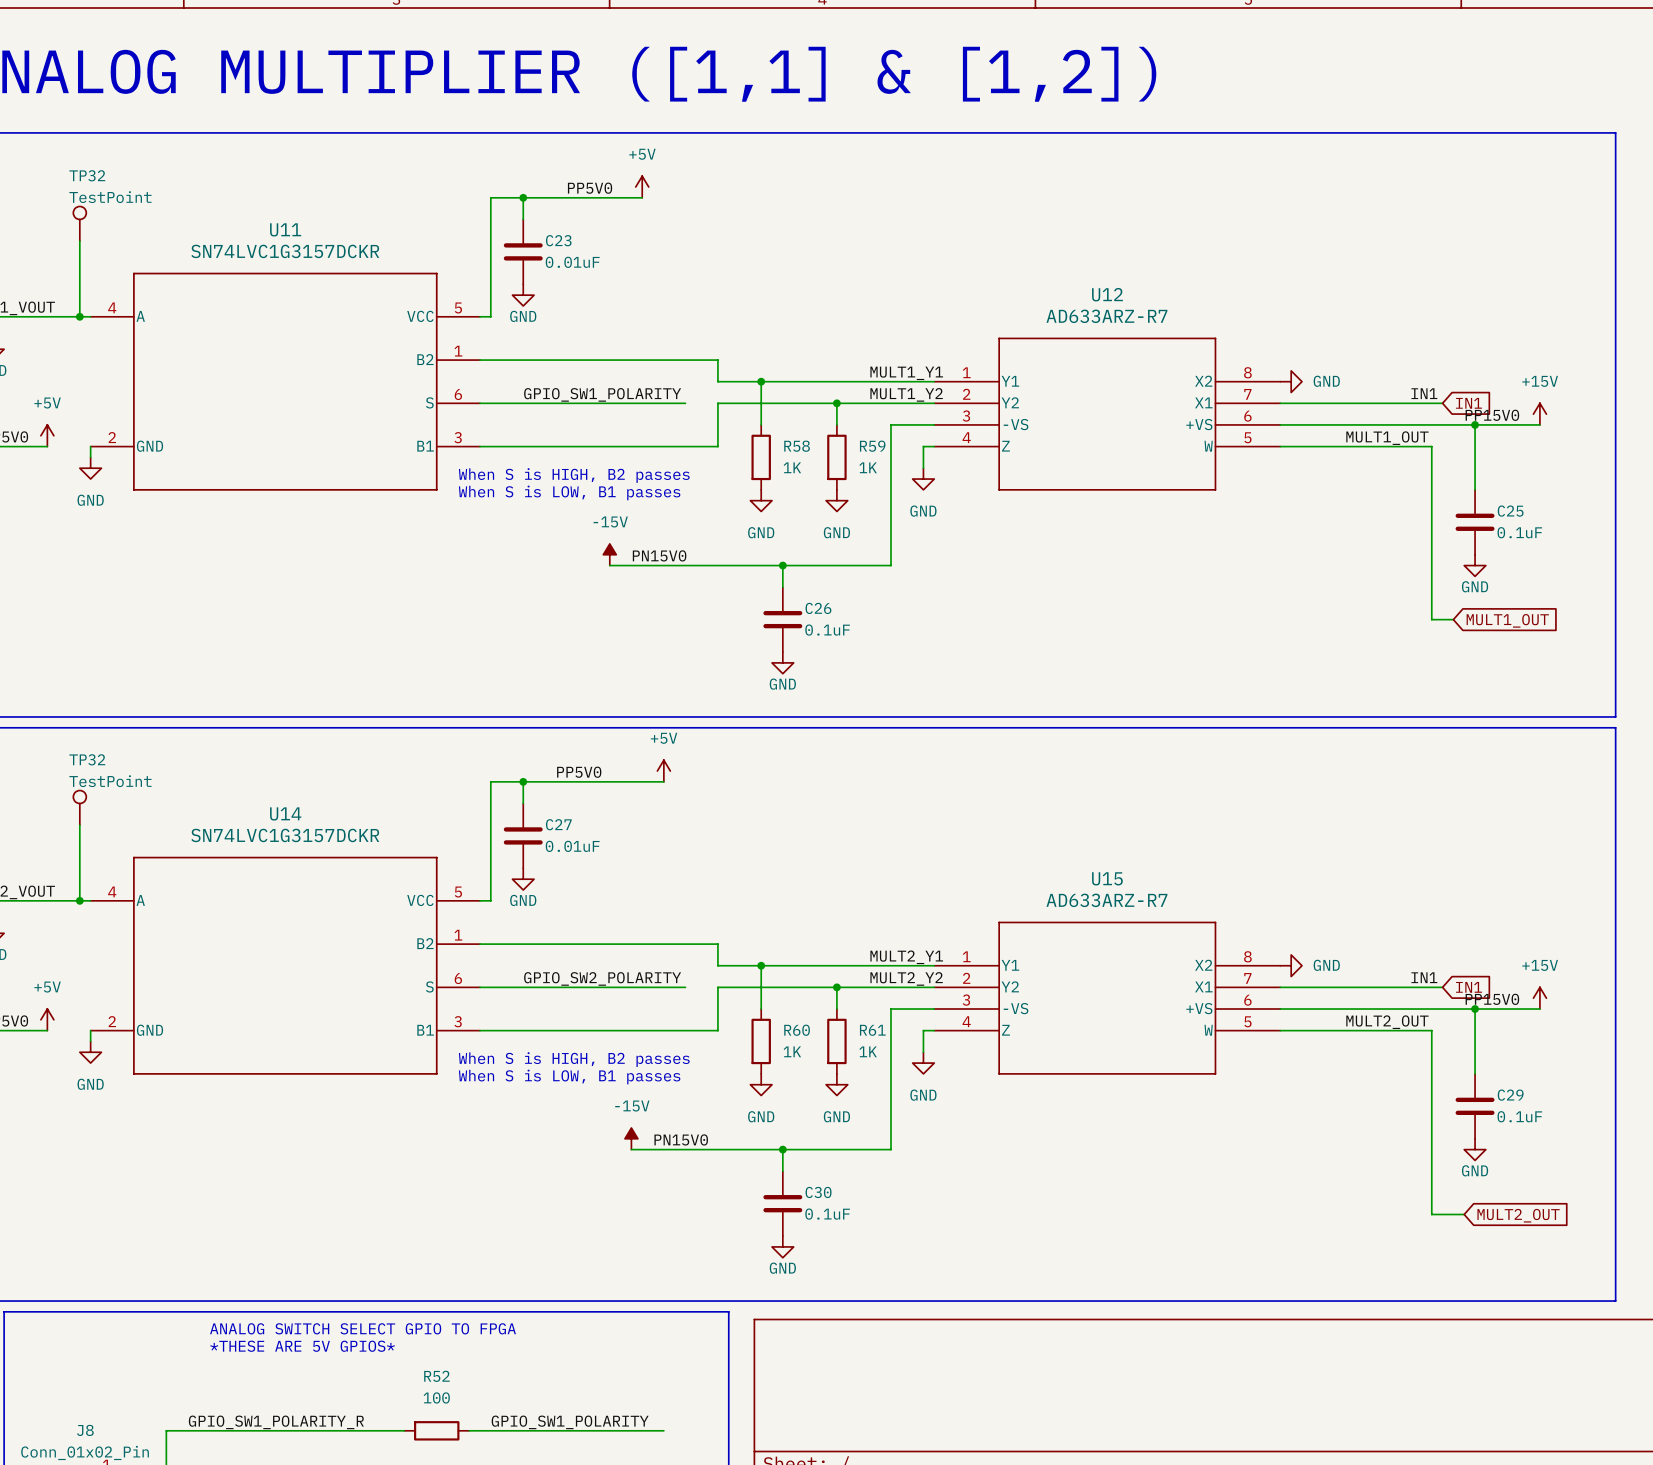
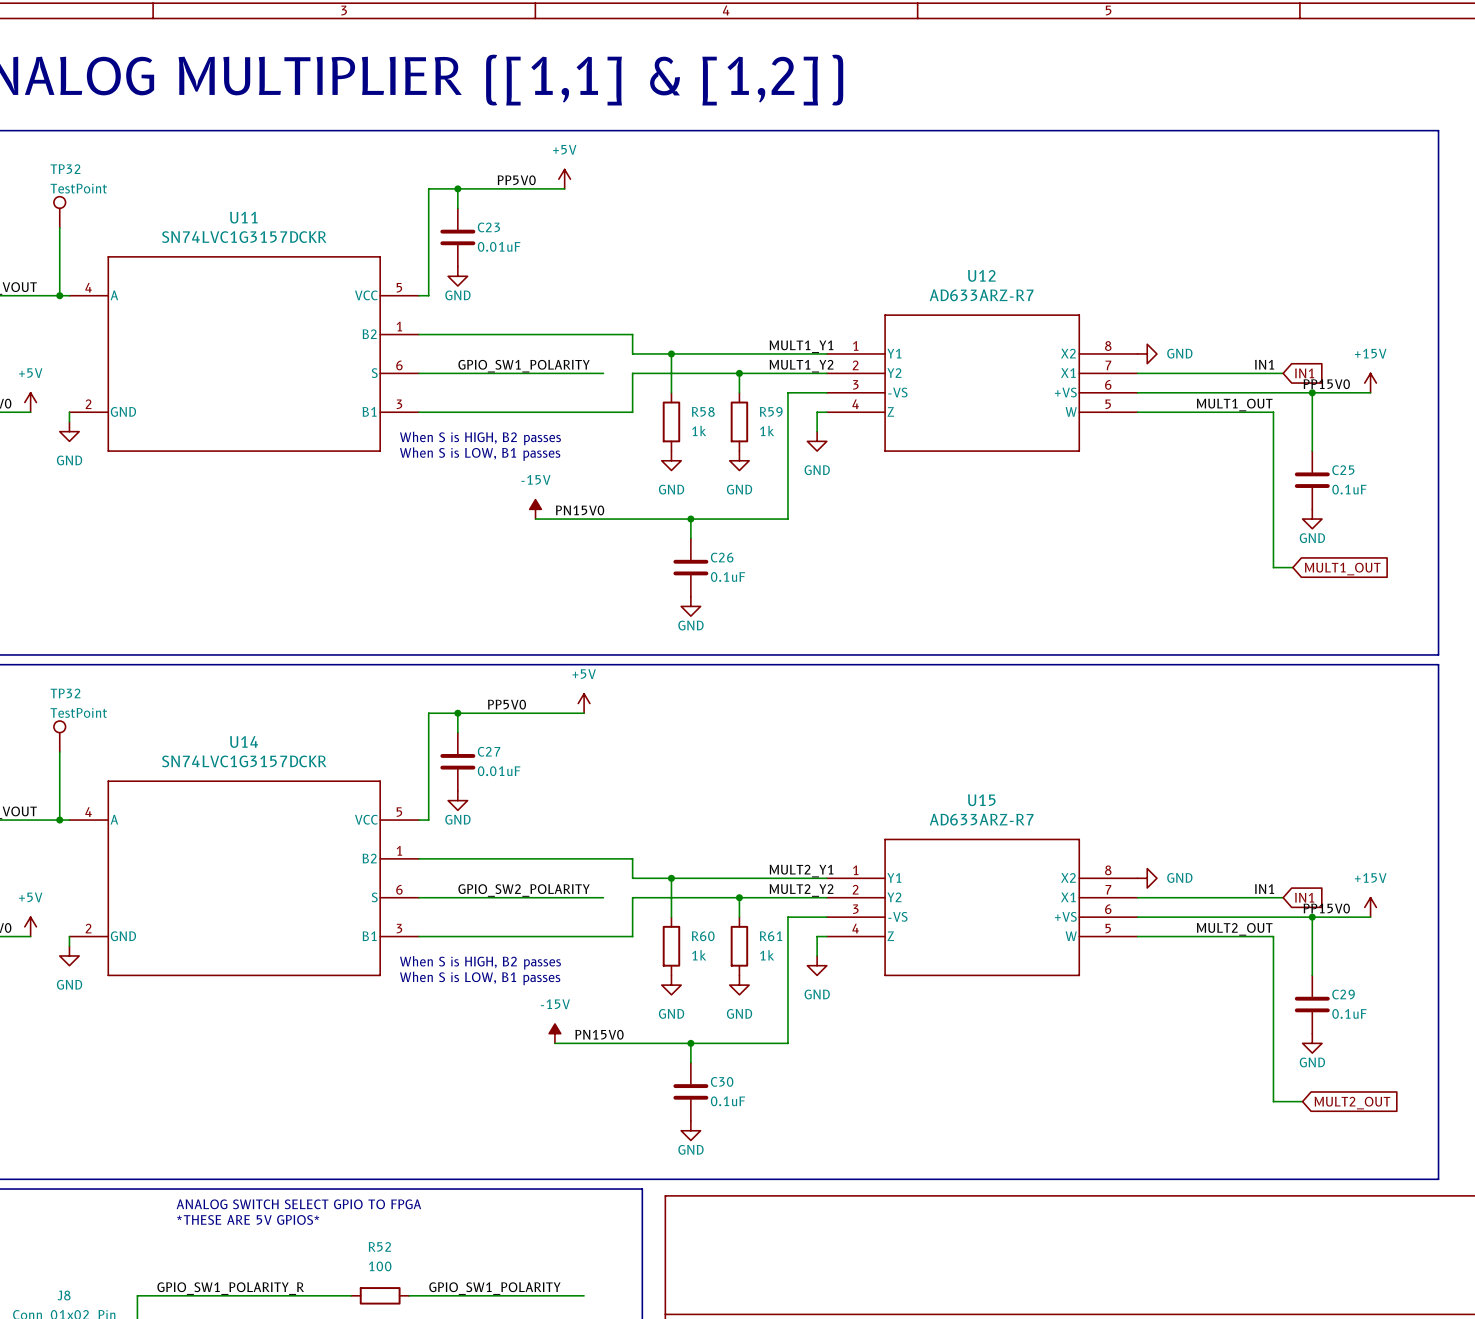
R58 value: 1K (792, 467) -> 1k (699, 430)
R59 value: 1K (868, 467) -> 1k (767, 430)
R60 value: 1K (792, 1051) -> 1k (699, 955)
R61 value: 1K (868, 1051) -> 1k (767, 955)

